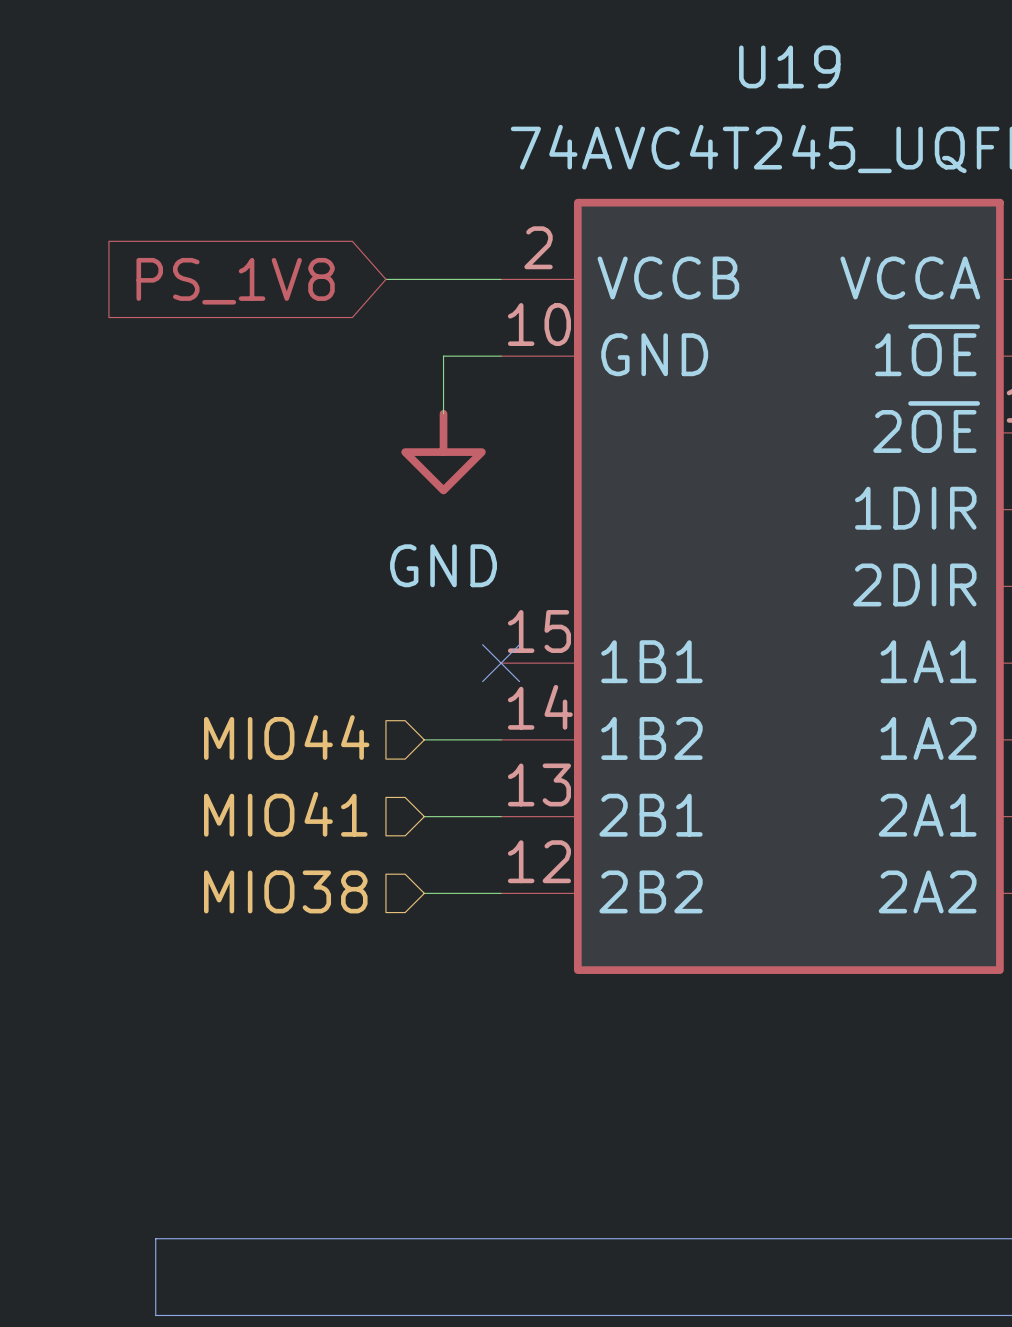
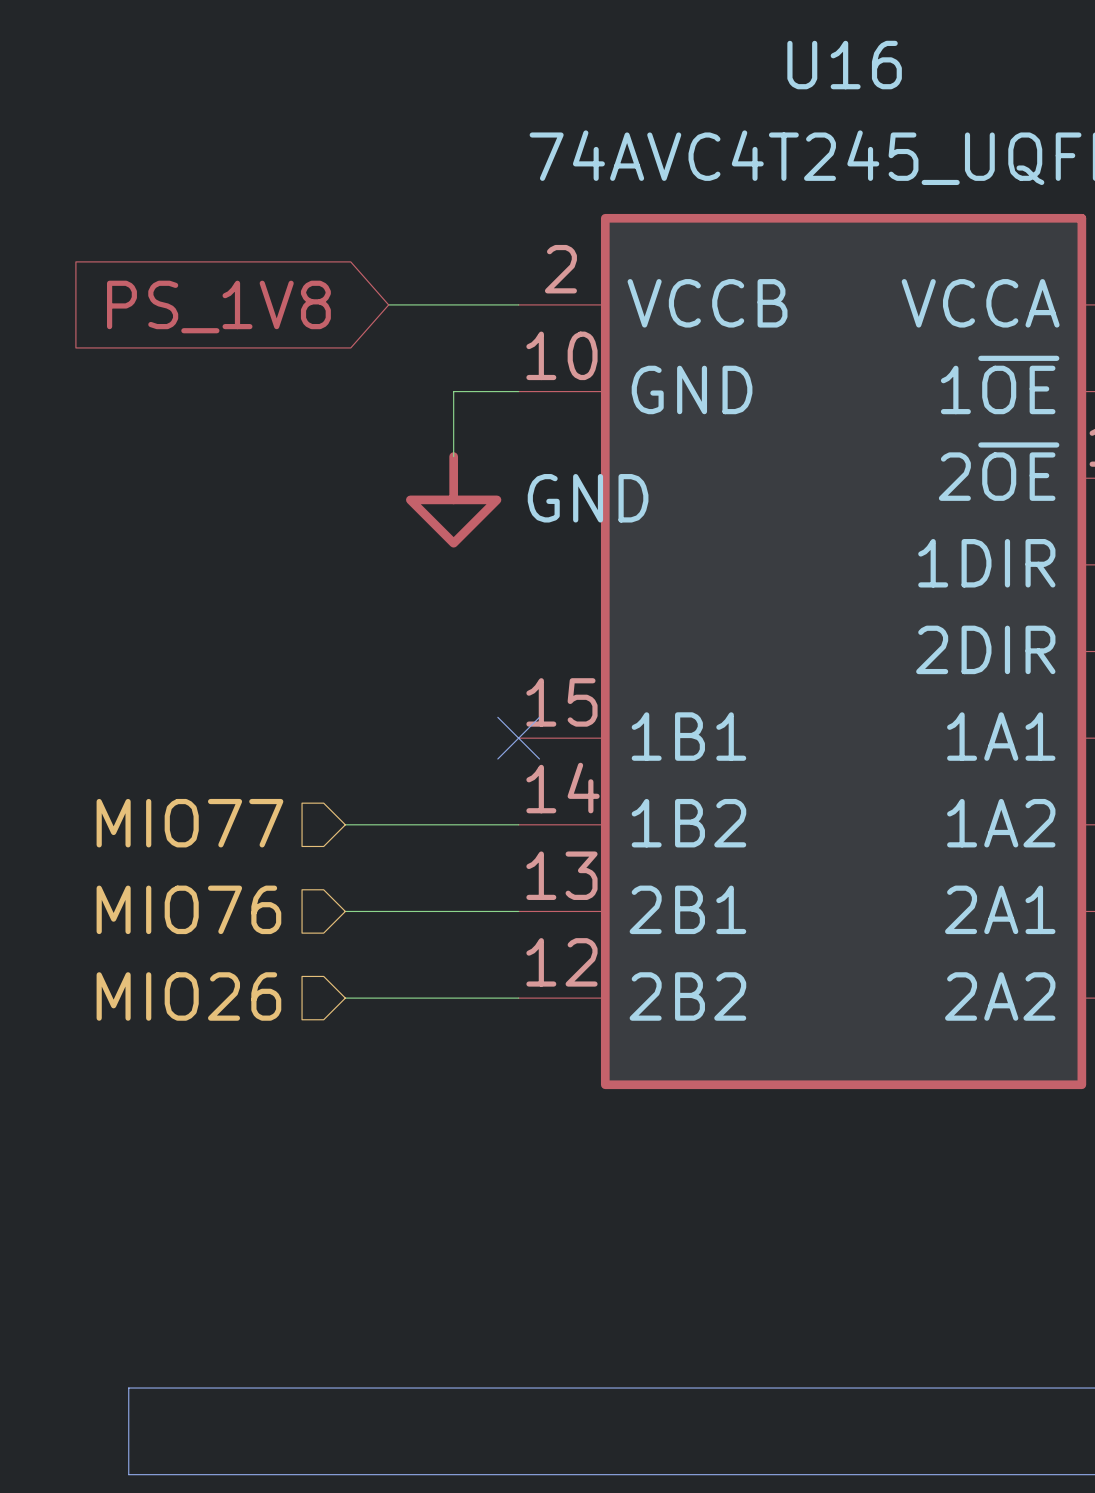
U19 name: U19 (789, 66) -> U16 (844, 65)
power symbol text position: GND (443, 565) -> GND (588, 498)
hierarchical label: MIO44 (286, 737) -> none
hierarchical label: none -> MIO77 (189, 823)
wire: none -> (345, 824) (432, 824)
hierarchical label: MIO41 (285, 814) -> none
hierarchical label: none -> MIO76 (188, 909)
wire: none -> (345, 911) (432, 911)
hierarchical label: none -> MIO26 (188, 996)
hierarchical label: MIO38 (285, 891) -> none
wire: none -> (345, 998) (432, 998)

